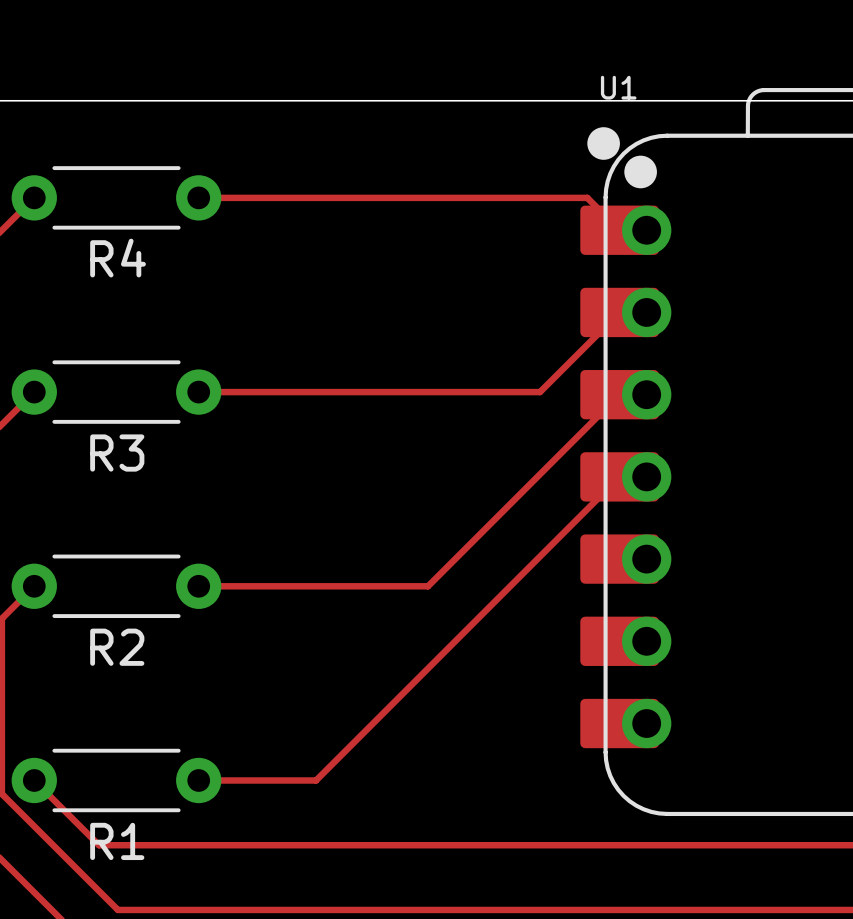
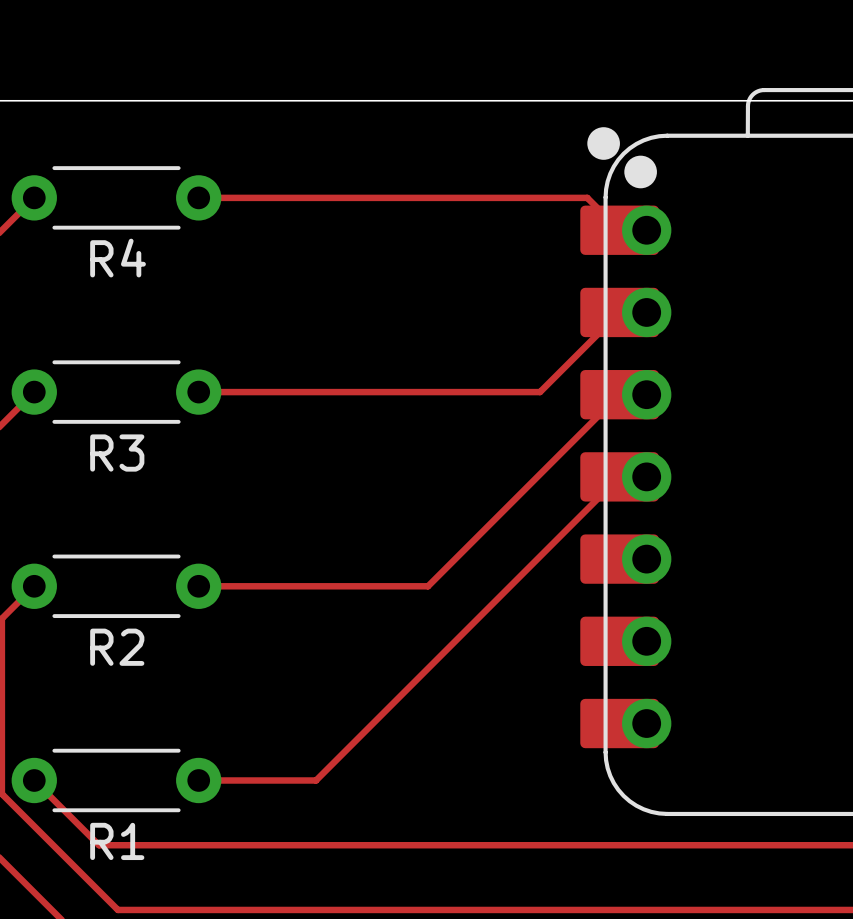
U1 name: U1 (618, 87) -> none

